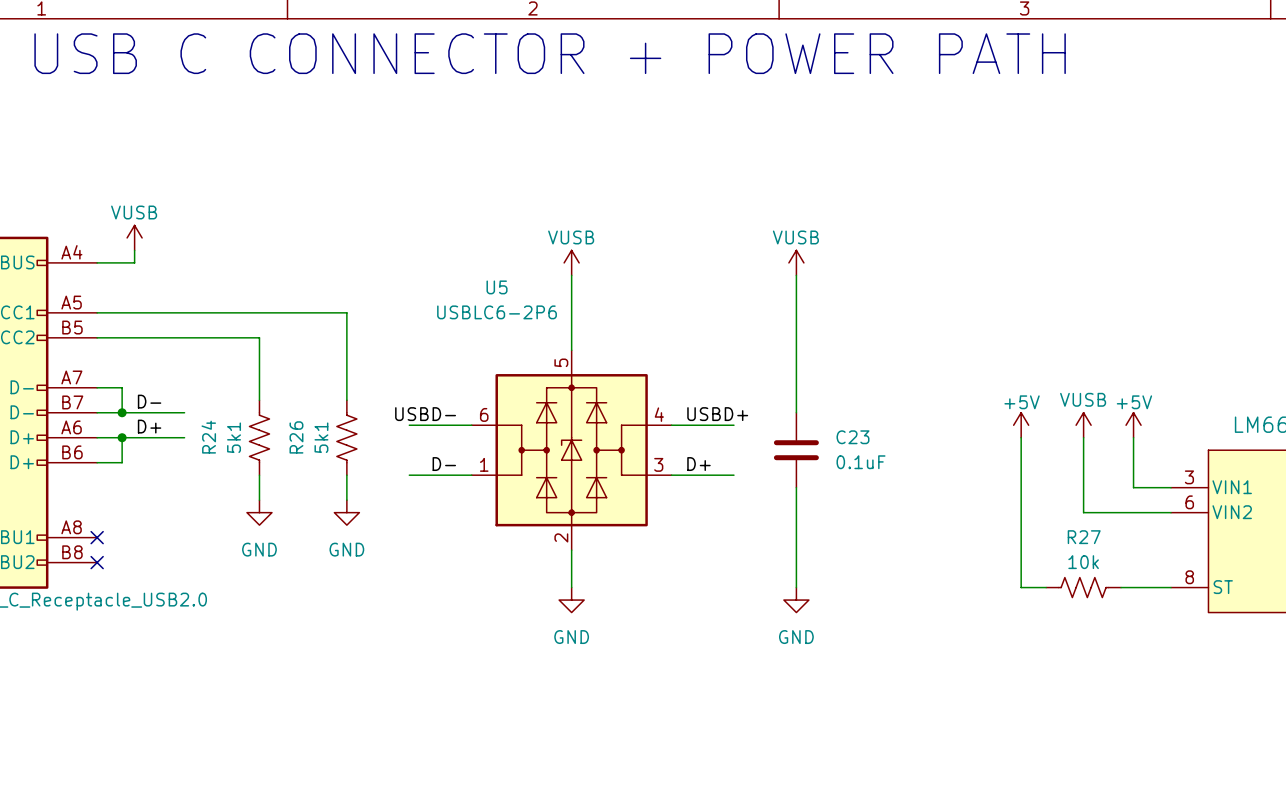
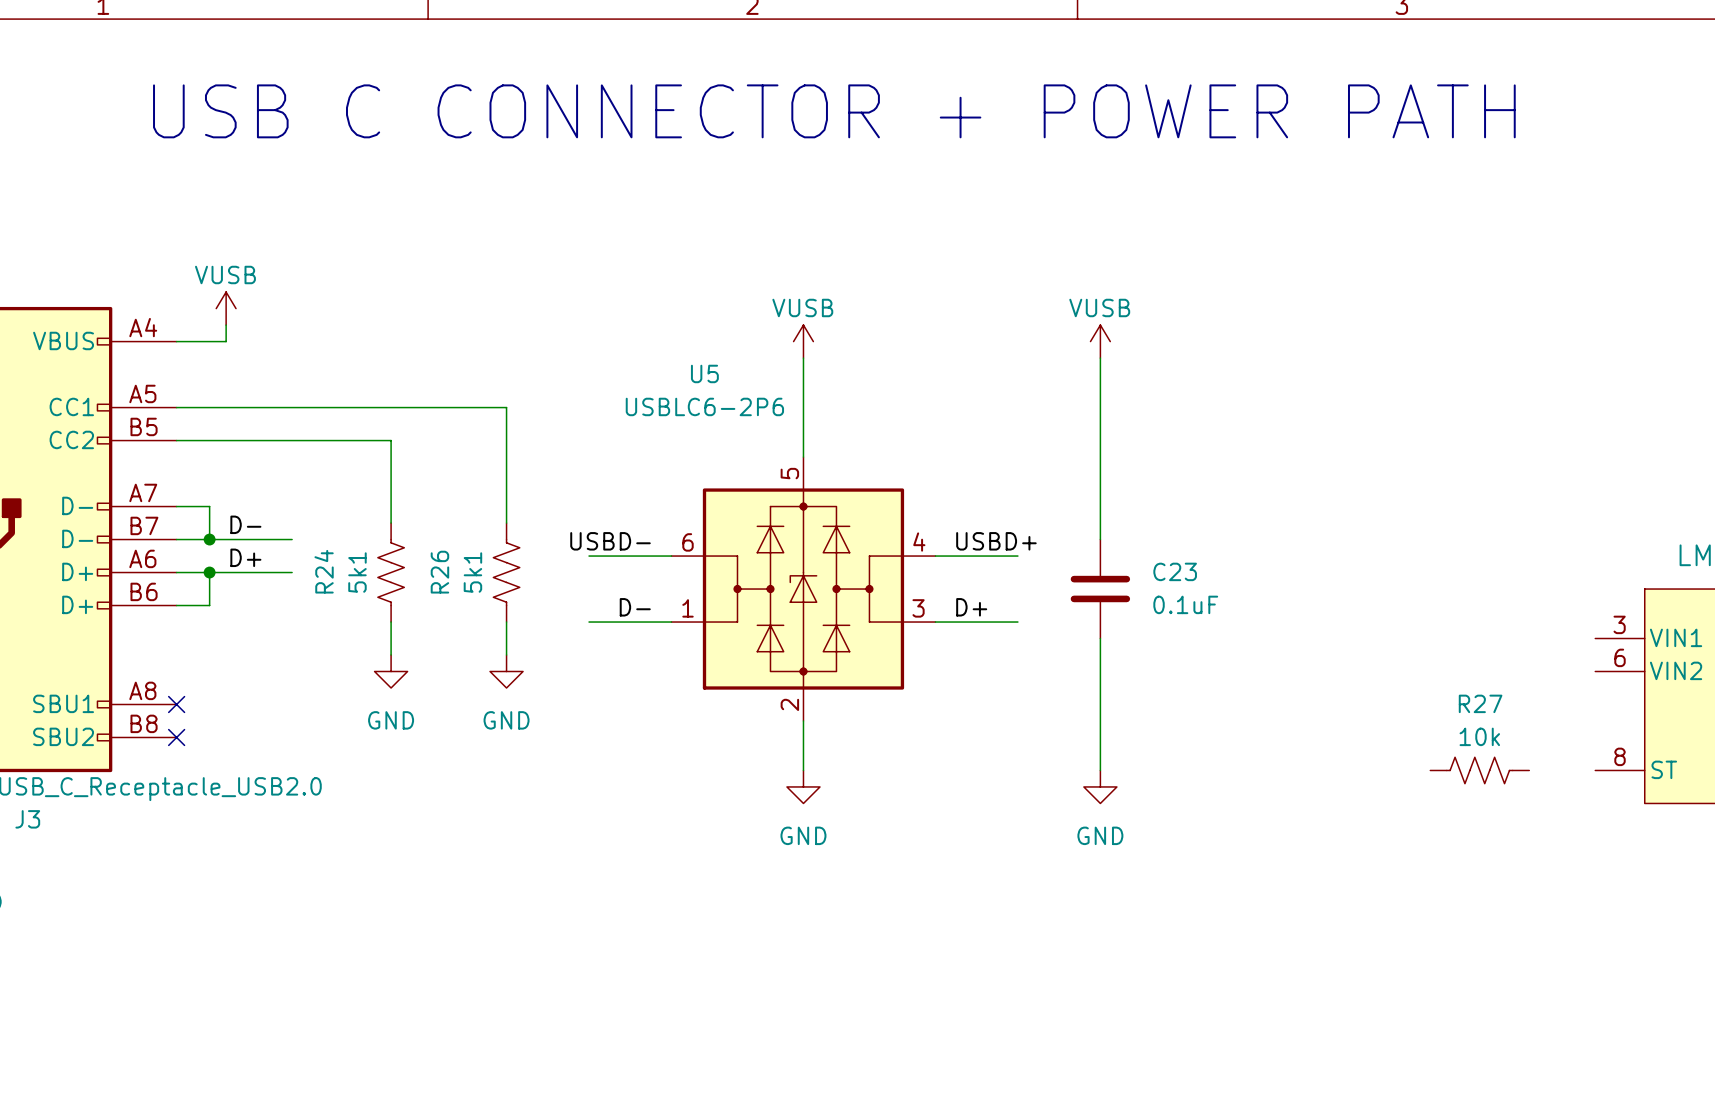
text position: USB C CONNECTOR + POWER PATH (550, 53) -> USB C CONNECTOR + POWER PATH (834, 111)
power symbol: +5V (1021, 425) -> none
power symbol: VUSB (1083, 425) -> none
power symbol: +5V (1133, 425) -> none
wire: (1021, 437) (1021, 587) (1046, 587) -> none
wire: (1083, 437) (1083, 512) (1171, 512) -> none
wire: (1133, 437) (1133, 487) (1171, 487) -> none
wire: (1121, 587) (1171, 587) -> none

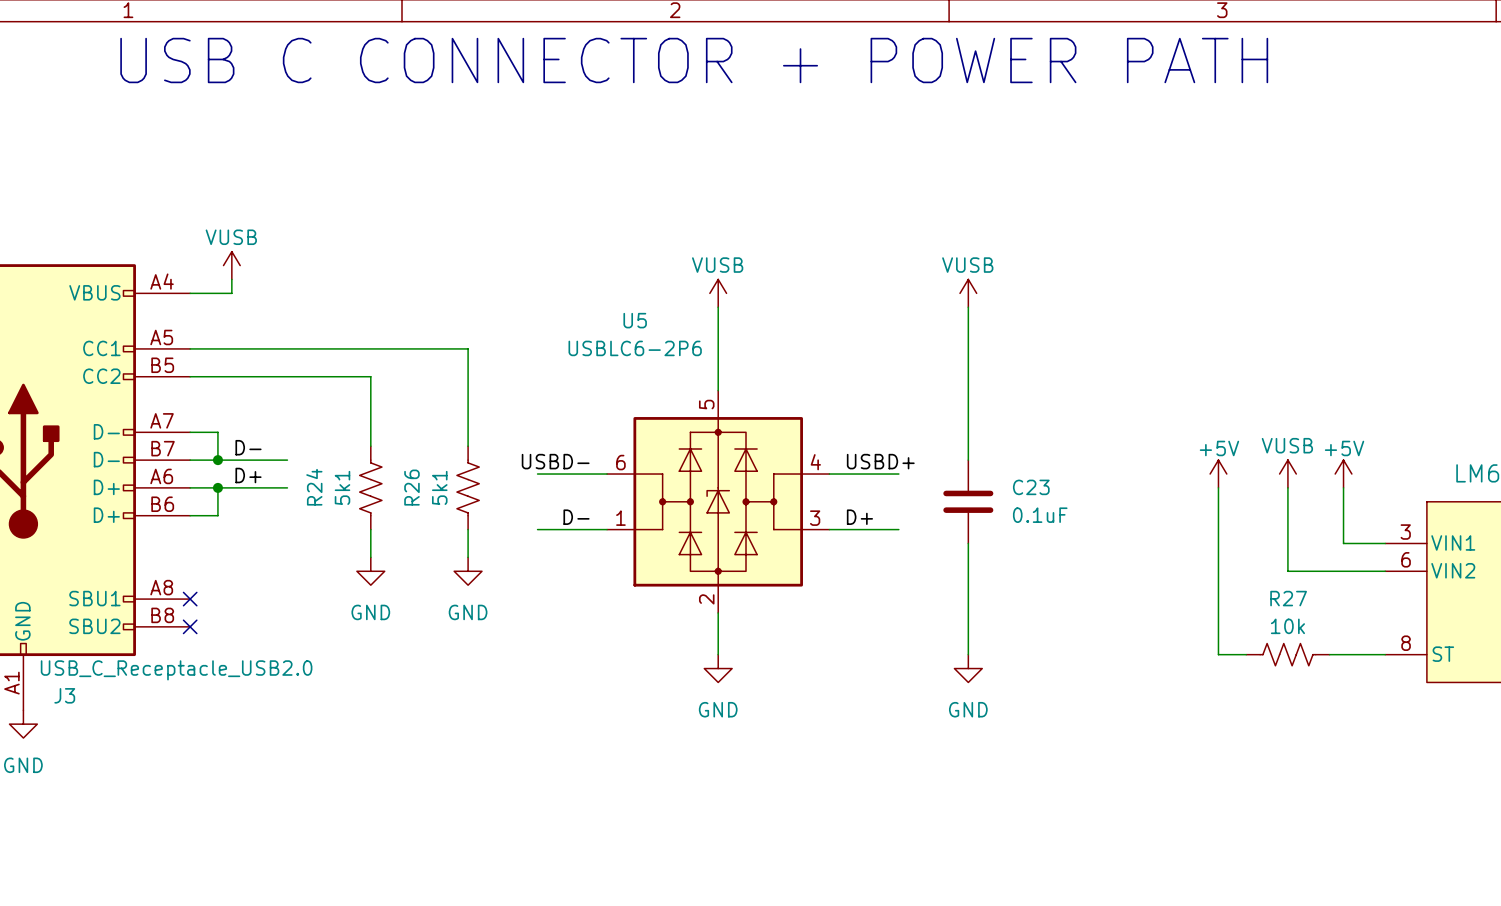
text position: USB C CONNECTOR + POWER PATH (834, 111) -> USB C CONNECTOR + POWER PATH (694, 60)
power symbol: none -> +5V (1218, 474)
power symbol: none -> VUSB (1287, 474)
power symbol: none -> +5V (1343, 474)
wire: none -> (1218, 487) (1218, 654) (1246, 654)
wire: none -> (1287, 487) (1287, 571) (1385, 571)
wire: none -> (1343, 487) (1343, 543) (1385, 543)
wire: none -> (1329, 654) (1385, 654)

